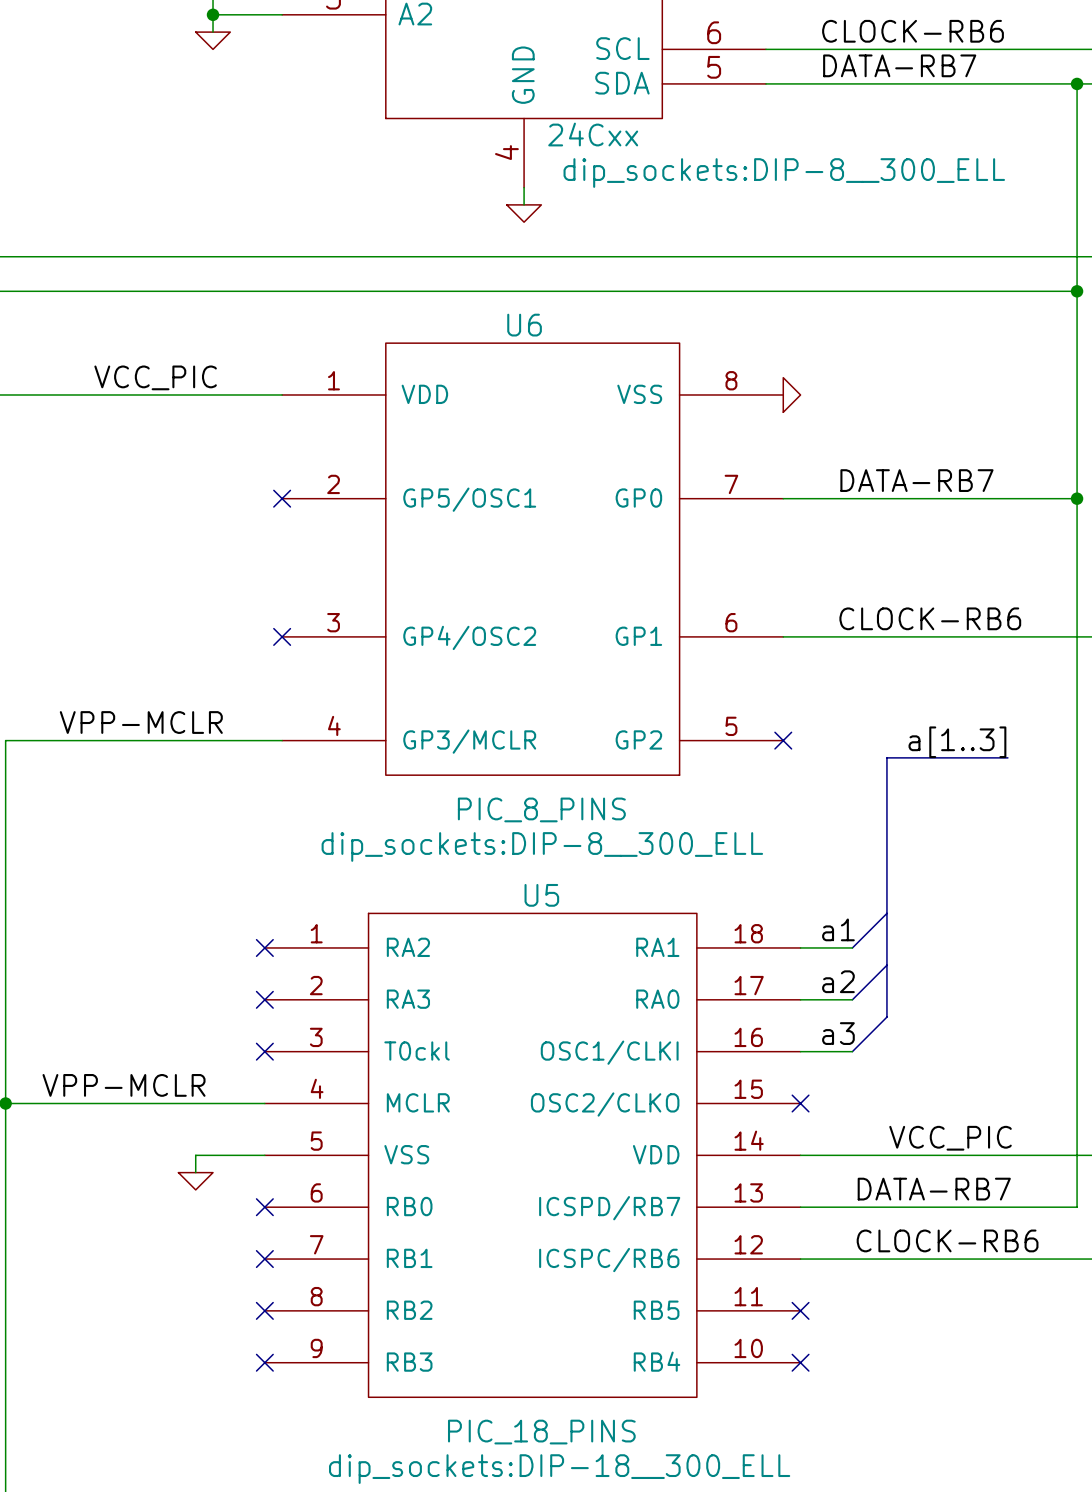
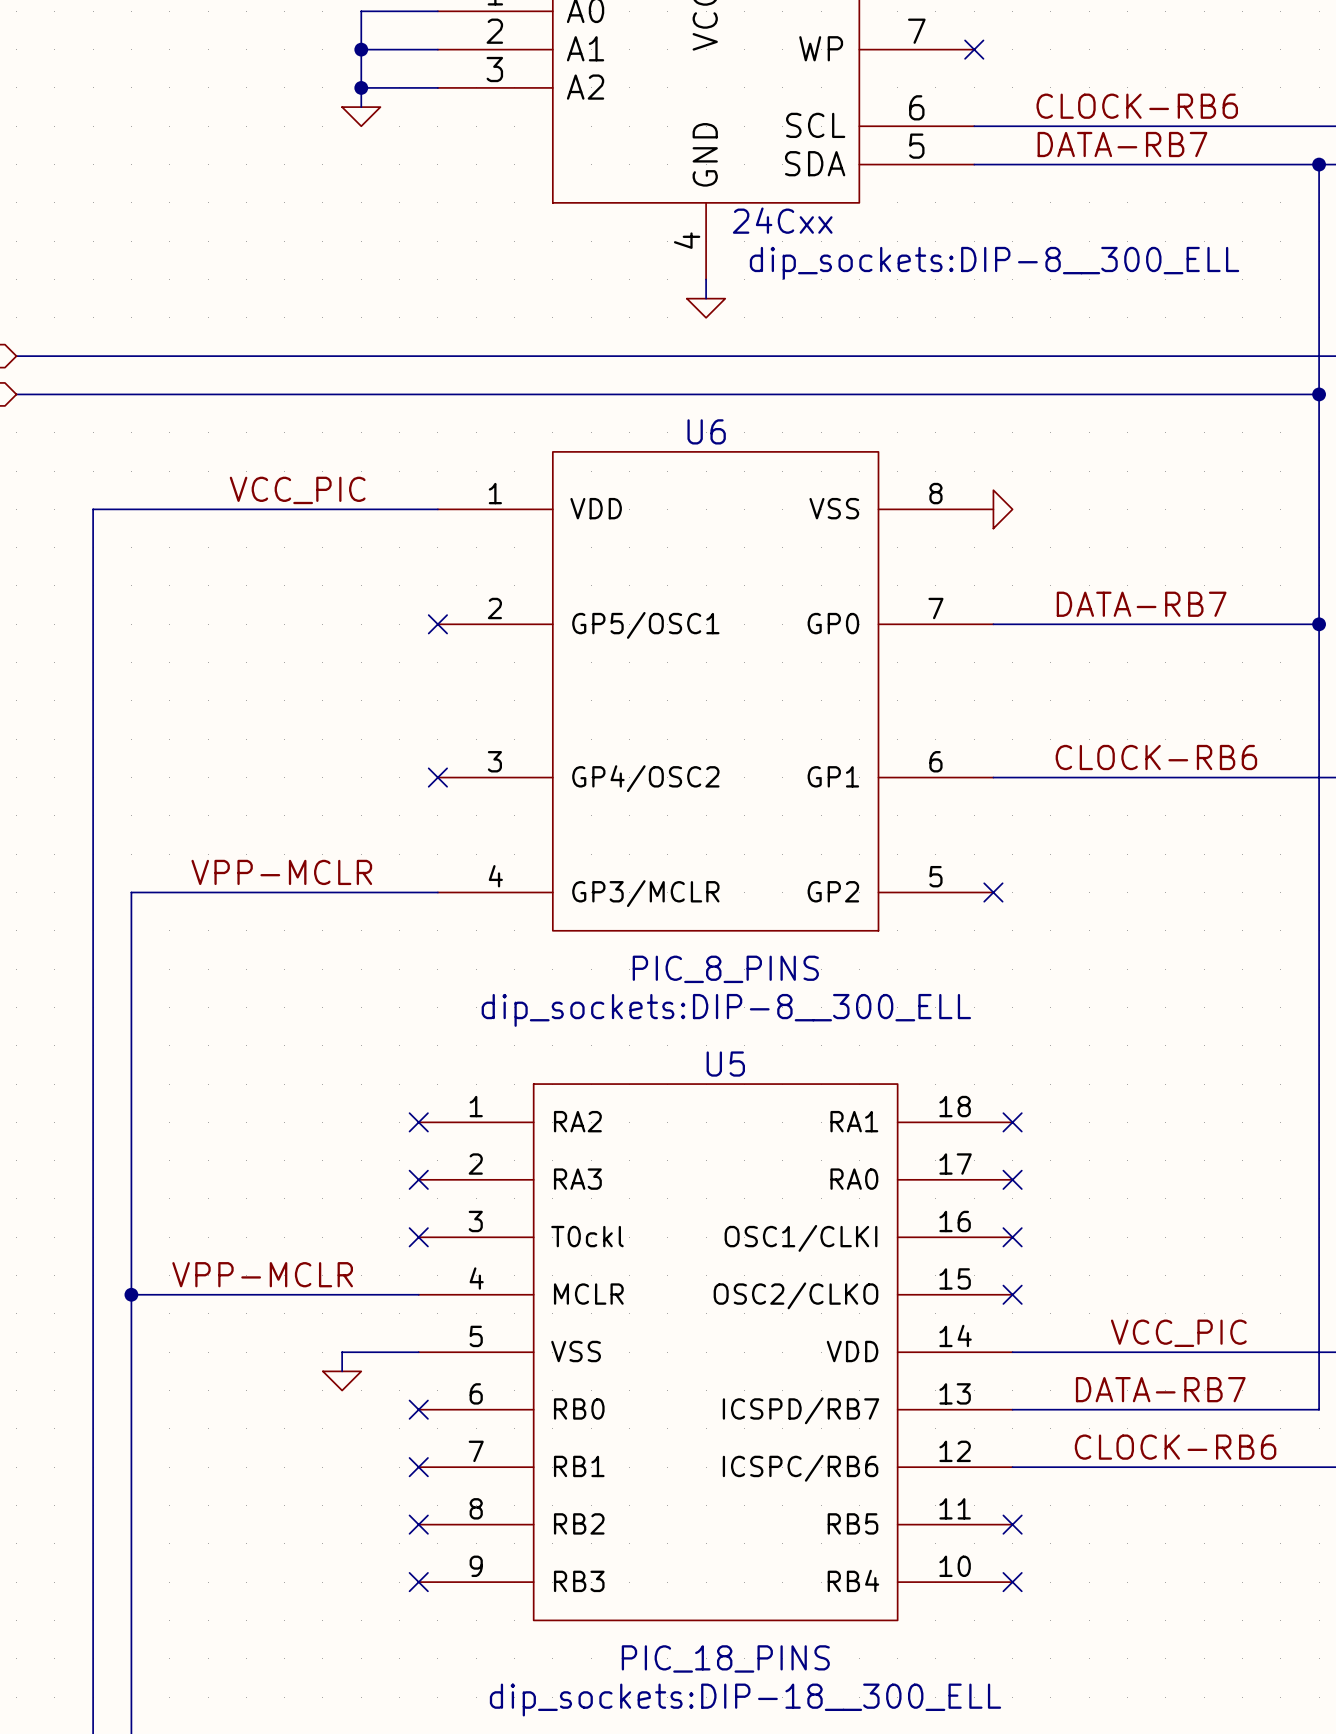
label: a[1..3] (957, 742) -> none
bus: (1007, 757) (886, 757) (886, 1017) (852, 1051) -> none
bus: (886, 913) (852, 947) -> none
label: a1 (838, 929) -> none
wire: (800, 947) (852, 947) -> none
no-connect mark: none -> (1012, 1122)
bus: (886, 965) (852, 999) -> none
label: a2 (838, 981) -> none
wire: (800, 999) (852, 999) -> none
no-connect mark: none -> (1012, 1179)
label: a3 (838, 1033) -> none
wire: (800, 1051) (852, 1051) -> none
no-connect mark: none -> (1012, 1237)

